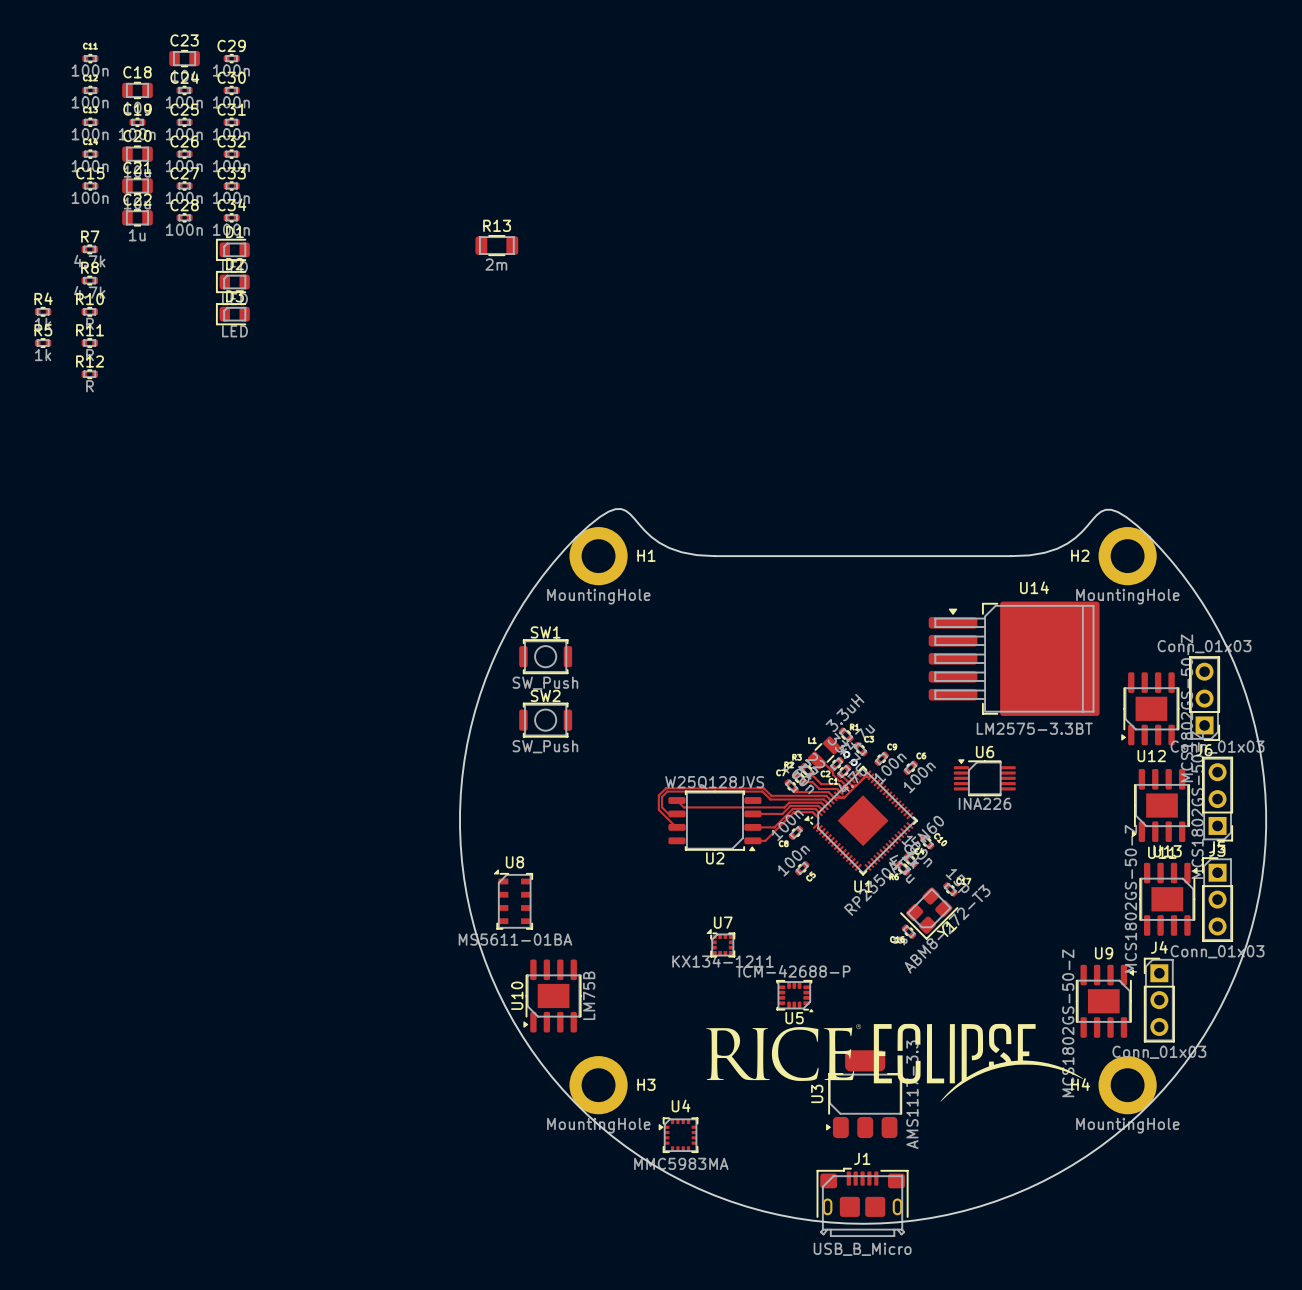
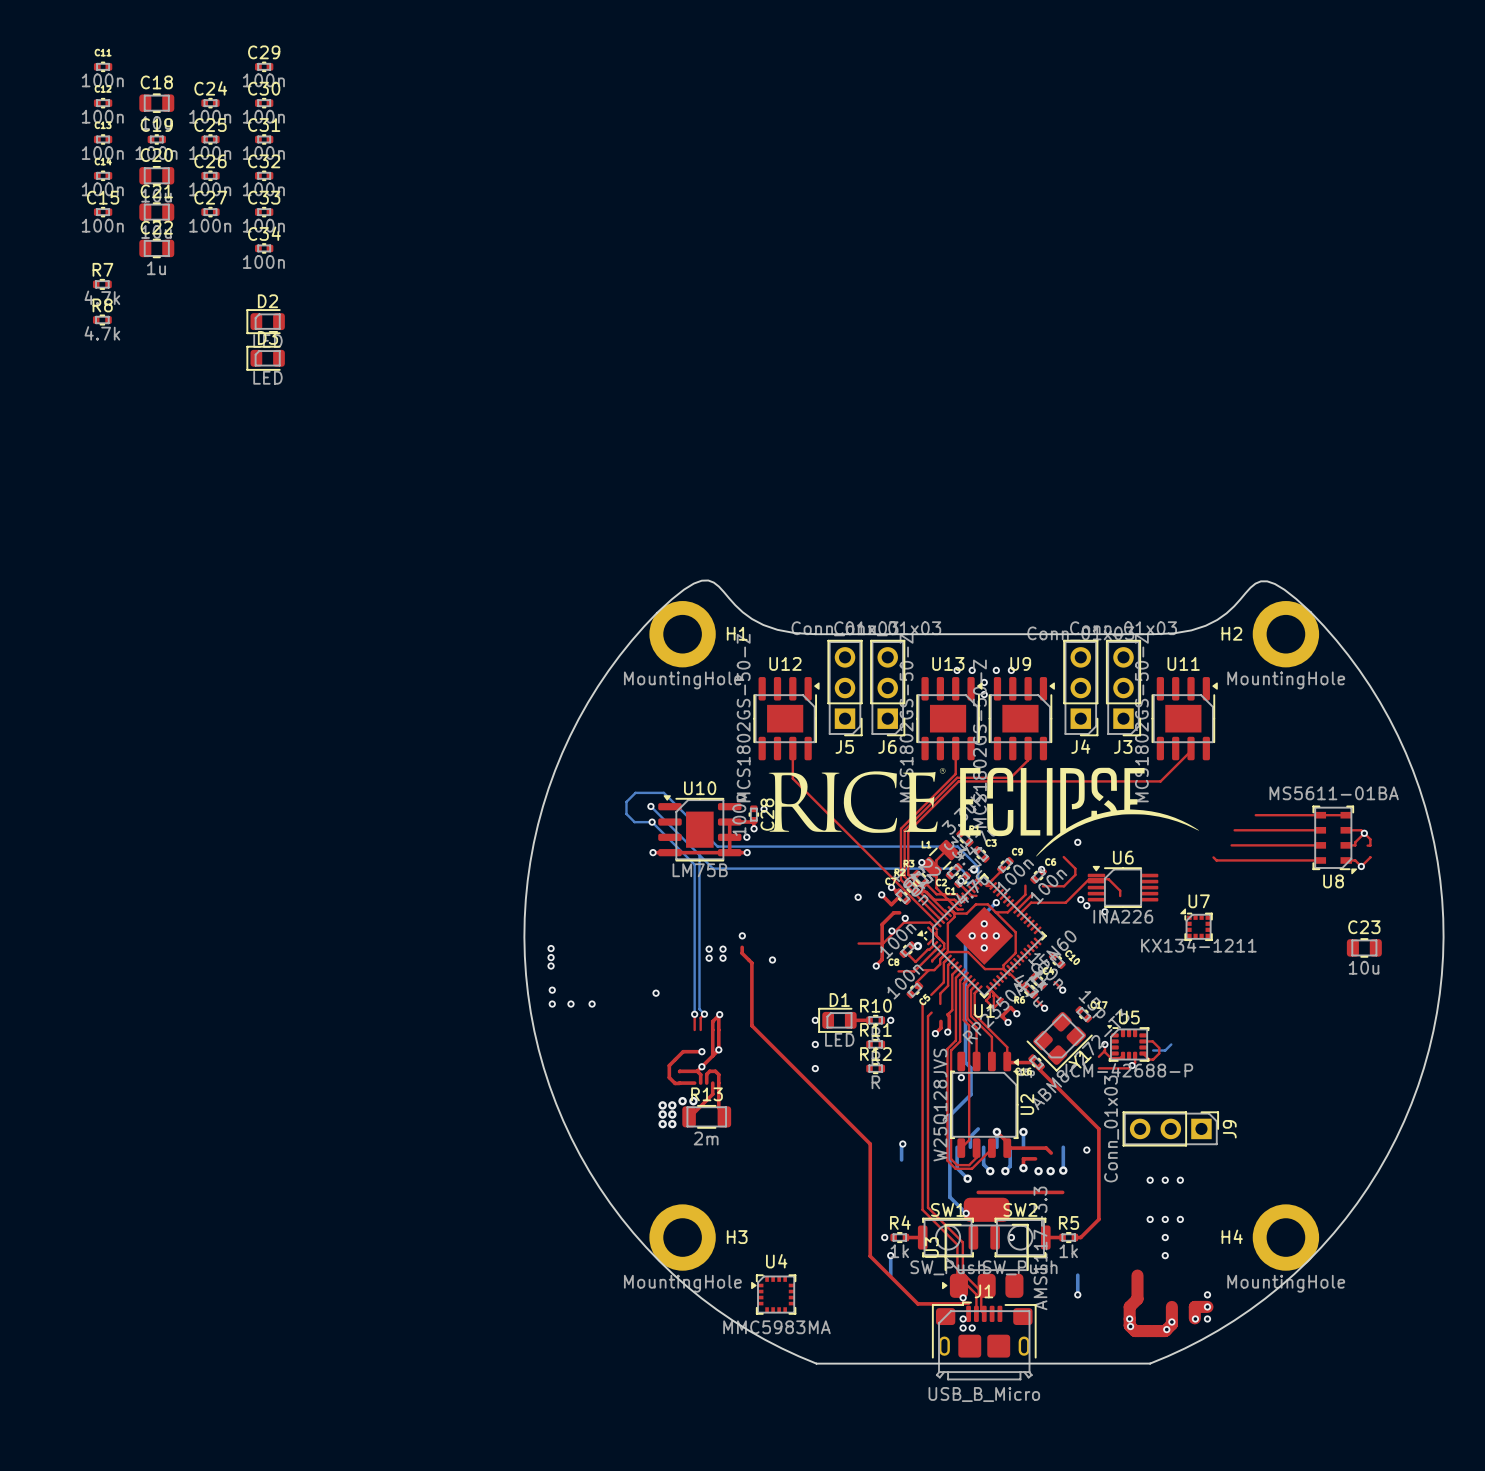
C23 position: (184, 58) -> (1364, 947)
C28 rotation: 0° (184, 217) -> 90° clockwise (753, 814)
C28 position: (184, 217) -> (753, 814)
R13 position: (496, 245) -> (706, 1116)
D1 position: (233, 249) -> (837, 1020)
R4 position: (43, 311) -> (899, 1237)
R10 position: (89, 311) -> (875, 1020)
R5 position: (43, 343) -> (1068, 1237)
R11 position: (89, 343) -> (875, 1044)
R12 position: (89, 374) -> (875, 1068)
board edge: (1149, 536) (1182, 575) (1219, 632) (1245, 694) (1258, 743) (1265, 793) (1264, 861) (1255, 911) (1235, 975) (1204, 1035) (1174, 1076) (1139, 1113) (1086, 1155) (1027, 1188) (980, 1206) (914, 1220) (863, 1223) (812, 1220) (746, 1206) (699, 1188) (639, 1156) (586, 1114) (552, 1077) (522, 1036) (491, 976) (470, 911) (462, 861) (460, 794) (467, 743) (480, 694) (506, 632) (542, 575) (576, 537) -> (1310, 612) (1348, 655) (1380, 702) (1405, 752) (1425, 806) (1437, 861) (1443, 918) (1441, 975) (1433, 1031) (1418, 1086) (1396, 1138) (1367, 1187) (1333, 1233) (1294, 1274) (1250, 1309) (1201, 1339) (1150, 1363) (816, 1363) (781, 1348) (748, 1330) (716, 1309) (686, 1286) (659, 1260) (633, 1233) (599, 1187) (580, 1155) (563, 1121) (549, 1085) (538, 1049) (530, 1012) (526, 975) (524, 937) (527, 880) (533, 843) (542, 806) (555, 770) (570, 735) (587, 702) (608, 670) (631, 640) (657, 612)
via: none -> (957, 670)
via: none -> (972, 670)
via: none -> (996, 670)
via: none -> (1011, 670)
via: none -> (984, 682)
via: none -> (984, 694)
SW1 position: (545, 656) -> (948, 1237)
U14: LM2575-3.3BT (1014, 658) -> none
drawing: none -> [768, 767, 1200, 857]
J6 position: (1204, 698) -> (887, 688)
bottom track: none -> (650, 806) (713, 868) (960, 868) (967, 875)
via: none -> (650, 806)
U12 rotation: 0° (1150, 708) -> 180° (786, 718)
U12 position: (1150, 708) -> (786, 718)
via: none -> (764, 809)
top track: none -> (1255, 815) (1346, 815)
SW2 position: (545, 720) -> (1020, 1237)
via: none -> (652, 822)
top track: none -> (754, 828) (753, 820) (752, 822) (729, 822) (729, 852)
via: none -> (754, 828)
top track: none -> (1234, 830) (1320, 830)
top track: none -> (1346, 830) (1361, 830) (1370, 839) (1370, 845) (1367, 845)
top track: none -> (1364, 833) (1355, 842) (1355, 845) (1346, 845)
via: none -> (1364, 833)
via: none -> (746, 837)
via: none -> (1077, 842)
top track: none -> (1231, 845) (1320, 845)
top track: none -> (653, 852) (747, 852)
via: none -> (653, 852)
via: none -> (747, 852)
top track: none -> (944, 851) (936, 860) (936, 888) (954, 906)
bottom track: none -> (699, 855) (699, 1009) (704, 1014)
top track: none -> (1063, 857) (1075, 868) (1075, 874) (1064, 886) (1042, 886)
top track: none -> (1213, 857) (1216, 860) (1320, 860)
top track: none -> (1370, 857) (1361, 866) (1355, 860) (1346, 860)
via: (846, 754) -> none
via: none -> (921, 862)
via: none -> (1361, 866)
top track: (817, 760) (821, 760) (833, 772) -> none
via: none -> (1041, 869)
top track: (833, 767) (833, 774) (846, 785) -> none
bottom track: none -> (961, 880) (962, 882) (973, 882) (978, 877) (978, 867) (957, 846) (717, 846) (663, 792) (635, 792) (626, 801) (626, 814) (634, 822) (652, 822) (694, 864) (694, 1014)
via: none -> (961, 880)
top track: (867, 773) (844, 797) (834, 797) (828, 792) (797, 792) (795, 789) -> (989, 882) (1004, 866)
top track: none -> (1025, 885) (1025, 894) (1007, 912) (995, 912)
top track: none -> (891, 887) (900, 895) (891, 904) (881, 894)
via: none -> (891, 887)
via: none -> (881, 894)
top track: none -> (1034, 894) (1017, 909)
top track: none -> (1120, 896) (1120, 890) (1108, 879) (1089, 879) (1065, 902) (1031, 902) (1020, 913)
via: none -> (858, 897)
via: none -> (1080, 899)
bottom track: none -> (996, 902) (965, 933) (965, 1062) (970, 1068) (970, 1094) (949, 1115) (949, 1197) (966, 1213)
via: none -> (996, 902)
via: none -> (1086, 905)
top track: (823, 799) (770, 799) (762, 791) (667, 791) (662, 796) (662, 807) (668, 813) (676, 813) -> (939, 911) (904, 876) (904, 830) (957, 777) (1010, 777) (1028, 760) (1028, 748)
via: none -> (1104, 911)
J3 position: (1217, 799) -> (1123, 688)
top track: (676, 800) (683, 807) (784, 807) (789, 802) (821, 802) -> (955, 748) (955, 774) (900, 828) (900, 879) (936, 915)
top track: none -> (899, 912) (893, 912) (882, 924) (882, 959) (876, 965)
top track: (831, 800) (826, 795) (771, 795) (763, 788) (666, 788) (658, 795) (658, 809) (676, 827) -> (947, 913) (908, 874) (908, 831) (958, 781) (1160, 781) (1191, 751) (1191, 748)
via: none -> (905, 918)
top track: (818, 805) (790, 805) (782, 813) (752, 813) -> (933, 919) (792, 778) (792, 748)
U11 rotation: 0° (1160, 805) -> 180° (1184, 718)
U11 position: (1160, 805) -> (1184, 718)
via: none -> (984, 923)
top track: (816, 815) (812, 812) (794, 812) (765, 840) (752, 840) -> (930, 930) (944, 943) (944, 948) (932, 961)
via: none -> (891, 931)
top track: none -> (936, 931) (936, 935)
via: none -> (742, 935)
U2 rotation: 0° (714, 820) -> 90° counterclockwise (984, 1104)
U2 position: (714, 820) -> (984, 1104)
via: none -> (972, 935)
via: none -> (984, 935)
via: none -> (996, 935)
top track: none -> (934, 944) (915, 961) (908, 954)
via: none -> (917, 946)
top track: none -> (742, 947) (742, 953) (751, 963) (751, 1025) (870, 1144) (870, 1256) (917, 1303) (968, 1303)
via: none -> (551, 948)
top track: none -> (937, 948) (914, 971) (898, 971)
via: none -> (984, 947)
via: none -> (709, 949)
via: none -> (723, 949)
top track: none -> (947, 952) (967, 952) (985, 969) (1003, 969)
via: none -> (551, 957)
via: none -> (709, 958)
via: none -> (723, 958)
top track: none -> (947, 958) (943, 962) (943, 982) (931, 994)
via: none -> (772, 960)
top track: none -> (949, 963) (948, 985) (940, 993) (940, 1003)
top track: none -> (954, 965) (958, 968) (952, 974) (952, 1010) (947, 1014) (949, 1030) (947, 1032)
via: none -> (551, 966)
via: none -> (876, 966)
top track: none -> (923, 970) (934, 970) (940, 964) (940, 959) (947, 951) (947, 923) (954, 917) (954, 912) (951, 909) (954, 913) (966, 913) (975, 904) (987, 904) (1015, 932) (1015, 953) (1003, 965) (1003, 968) (1028, 992)
top track: none -> (928, 970) (916, 982) (916, 987)
top track: none -> (961, 972) (955, 977) (955, 1040) (947, 1049) (947, 1160) (955, 1168) (971, 1168) (991, 1148)
top track: none -> (965, 975) (960, 980) (960, 1041) (951, 1050) (951, 1159) (957, 1165) (969, 1165) (976, 1157) (976, 1148)
top track: none -> (968, 978) (963, 983) (963, 1020) (969, 1025) (969, 1140) (961, 1148)
top track: none -> (971, 982) (967, 986) (967, 1018) (976, 1027) (976, 1061)
top track: none -> (1054, 982) (1062, 990)
top track: none -> (975, 985) (971, 990) (971, 1016) (991, 1037) (991, 1061)
top track: none -> (978, 989) (974, 993) (974, 1014) (1007, 1047) (1007, 1061) (1032, 1062) (1098, 1128) (1098, 1219) (1080, 1237) (1074, 1237)
via: none -> (552, 990)
via: none -> (1062, 990)
via: none -> (656, 993)
top track: none -> (993, 992) (993, 1008) (986, 1000) (989, 996) (989, 989) (999, 999) (1002, 999) (993, 1007)
top track: none -> (1036, 1000) (1044, 1008)
via: none -> (552, 1004)
via: none -> (570, 1004)
via: none -> (592, 1004)
top track: none -> (922, 1003) (922, 1209) (957, 1244) (957, 1275) (976, 1294) (976, 1313)
via: none -> (1044, 1008)
top track: none -> (931, 1012) (928, 1016) (928, 1207) (962, 1242) (962, 1273) (981, 1291) (981, 1310) (984, 1313)
top track: none -> (1016, 1013) (1010, 1007) (1002, 1016) (1008, 1022)
via: none -> (1016, 1013)
top track: none -> (694, 1014) (694, 1029)
via: none -> (694, 1014)
top track: none -> (704, 1014) (700, 1017) (700, 1029)
via: none -> (704, 1014)
top track: none -> (719, 1014) (712, 1021) (712, 1055)
via: none -> (719, 1014)
top track: none -> (718, 1015) (718, 1049) (697, 1071)
via: none -> (815, 1020)
top track: none -> (850, 1020) (869, 1020)
via: none -> (890, 1020)
top track: none -> (940, 1021) (940, 1028) (935, 1033)
via: none -> (1008, 1022)
U8 rotation: 0° (513, 899) -> 180° (1334, 840)
U8 position: (513, 899) -> (1334, 840)
U13 position: (1168, 899) -> (949, 718)
J5 rotation: 0° (1217, 899) -> 180° (845, 688)
J5 position: (1217, 899) -> (845, 688)
via: none -> (947, 1032)
via: none -> (935, 1033)
top track: none -> (1143, 1041) (1152, 1041) (1159, 1048) (1159, 1053) (1153, 1059) (1149, 1059) (1143, 1053)
via: none -> (815, 1044)
top track: none -> (1104, 1044) (1104, 1052) (1110, 1058) (1120, 1058) (1123, 1055)
via: none -> (1104, 1044)
bottom track: none -> (1171, 1044) (1165, 1050) (1153, 1050)
via: none -> (718, 1049)
top track: none -> (1104, 1050) (1098, 1056)
top track: none -> (701, 1051) (683, 1051) (669, 1065) (669, 1077) (675, 1083) (679, 1083)
via: none -> (701, 1051)
top track: none -> (1135, 1055) (1135, 1062) (1129, 1068) (1098, 1068)
via: none -> (1132, 1065)
via: none -> (701, 1066)
via: none -> (815, 1068)
top track: none -> (697, 1071) (700, 1074) (700, 1083)
top track: none -> (697, 1071) (679, 1071)
U7 position: (720, 943) -> (1196, 924)
via: none -> (961, 1077)
top track: none -> (679, 1083) (694, 1083)
top track: none -> (706, 1083) (706, 1074) (709, 1071) (715, 1071) (718, 1074) (718, 1107) (726, 1115)
top track: none -> (712, 1083) (712, 1094) (691, 1115)
via: none -> (682, 1101)
via: none -> (693, 1101)
via: none -> (662, 1105)
via: none -> (672, 1105)
via: none -> (662, 1114)
via: none -> (672, 1114)
via: none -> (662, 1124)
via: none -> (672, 1124)
bottom track: none -> (978, 1128) (970, 1136) (970, 1147)
J9: none -> Conn_01x03 (1170, 1128)
top track: none -> (996, 1131) (1007, 1142) (1007, 1148) (1046, 1148) (1051, 1153)
bottom track: none -> (996, 1131) (996, 1147)
via: none -> (996, 1131)
bottom track: none -> (1023, 1131) (1023, 1147)
via: none -> (1023, 1131)
U10 rotation: 0° (552, 995) -> 90° clockwise (699, 828)
U10 position: (552, 995) -> (699, 828)
U5 rotation: 0° (795, 996) -> 180° (1128, 1043)
U5 position: (795, 996) -> (1128, 1043)
J4 rotation: 0° (1159, 1000) -> 180° (1080, 688)
J4 position: (1159, 1000) -> (1080, 688)
U9 position: (1105, 1001) -> (1021, 718)
bottom track: none -> (902, 1144) (901, 1159)
via: none -> (902, 1144)
bottom track: none -> (957, 1147) (957, 1168) (967, 1178)
bottom track: none -> (983, 1147) (983, 1164) (990, 1171)
bottom track: none -> (1010, 1147) (1010, 1166) (1005, 1171)
bottom track: none -> (1063, 1147) (1063, 1170)
via: none -> (1086, 1150)
top track: none -> (1035, 1158) (1023, 1158) (1023, 1168)
drawing: [705, 1023, 1084, 1102] -> none
via: none -> (1023, 1168)
via: none -> (990, 1171)
via: none -> (1005, 1171)
via: none -> (1038, 1171)
via: none -> (1050, 1171)
via: none -> (1063, 1170)
via: none -> (967, 1178)
via: none -> (1150, 1180)
via: none -> (1165, 1180)
via: none -> (1180, 1180)
top track: none -> (978, 1192) (1062, 1192)
via: none -> (966, 1213)
via: none -> (1150, 1219)
via: none -> (1165, 1219)
via: none -> (1180, 1219)
via: none -> (884, 1237)
top track: none -> (905, 1237) (922, 1237)
via: none -> (1011, 1237)
top track: none -> (1045, 1237) (1062, 1237)
via: none -> (1165, 1237)
bottom track: none -> (890, 1255) (890, 1275)
via: none -> (890, 1255)
via: none -> (1165, 1255)
bottom track: none -> (1077, 1275) (1077, 1294)
top track: none -> (1137, 1275) (1137, 1299) (1129, 1306) (1129, 1325) (1135, 1331) (1165, 1331) (1171, 1324) (1171, 1306)
via: none -> (1077, 1294)
via: none -> (1207, 1294)
via: none -> (963, 1297)
top track: none -> (1207, 1306) (1194, 1306) (1194, 1318)
via: none -> (1207, 1306)
via: none -> (963, 1318)
via: none -> (1129, 1318)
via: none -> (1195, 1318)
via: none -> (1207, 1318)
via: none -> (1171, 1322)
via: none -> (1130, 1326)
via: none -> (963, 1328)
via: none -> (972, 1328)
via: none -> (1166, 1329)
J1 position: (862, 1202) -> (984, 1340)

